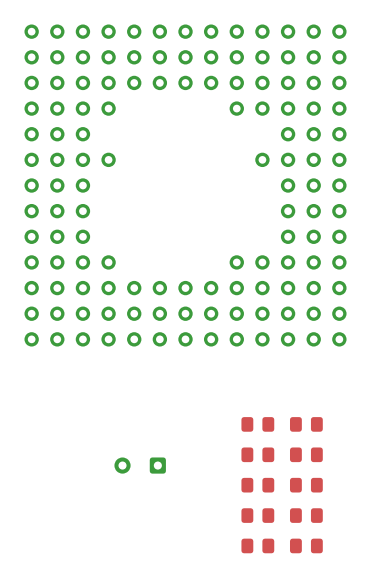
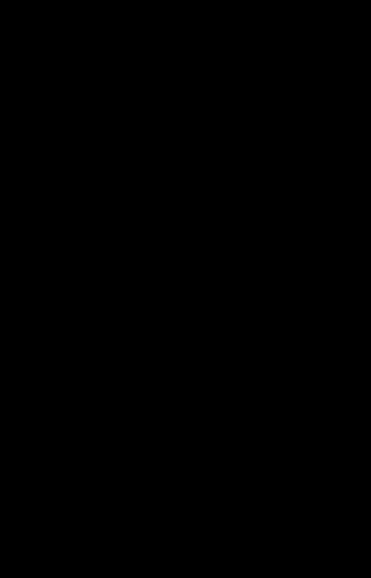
part: (185, 185) -> none
part: (257, 424) -> none
part: (306, 424) -> none
part: (257, 454) -> none
part: (306, 454) -> none
part: (140, 465) -> none
part: (257, 485) -> none
part: (306, 485) -> none
part: (257, 515) -> none
part: (306, 515) -> none
part: (257, 545) -> none
part: (306, 545) -> none

